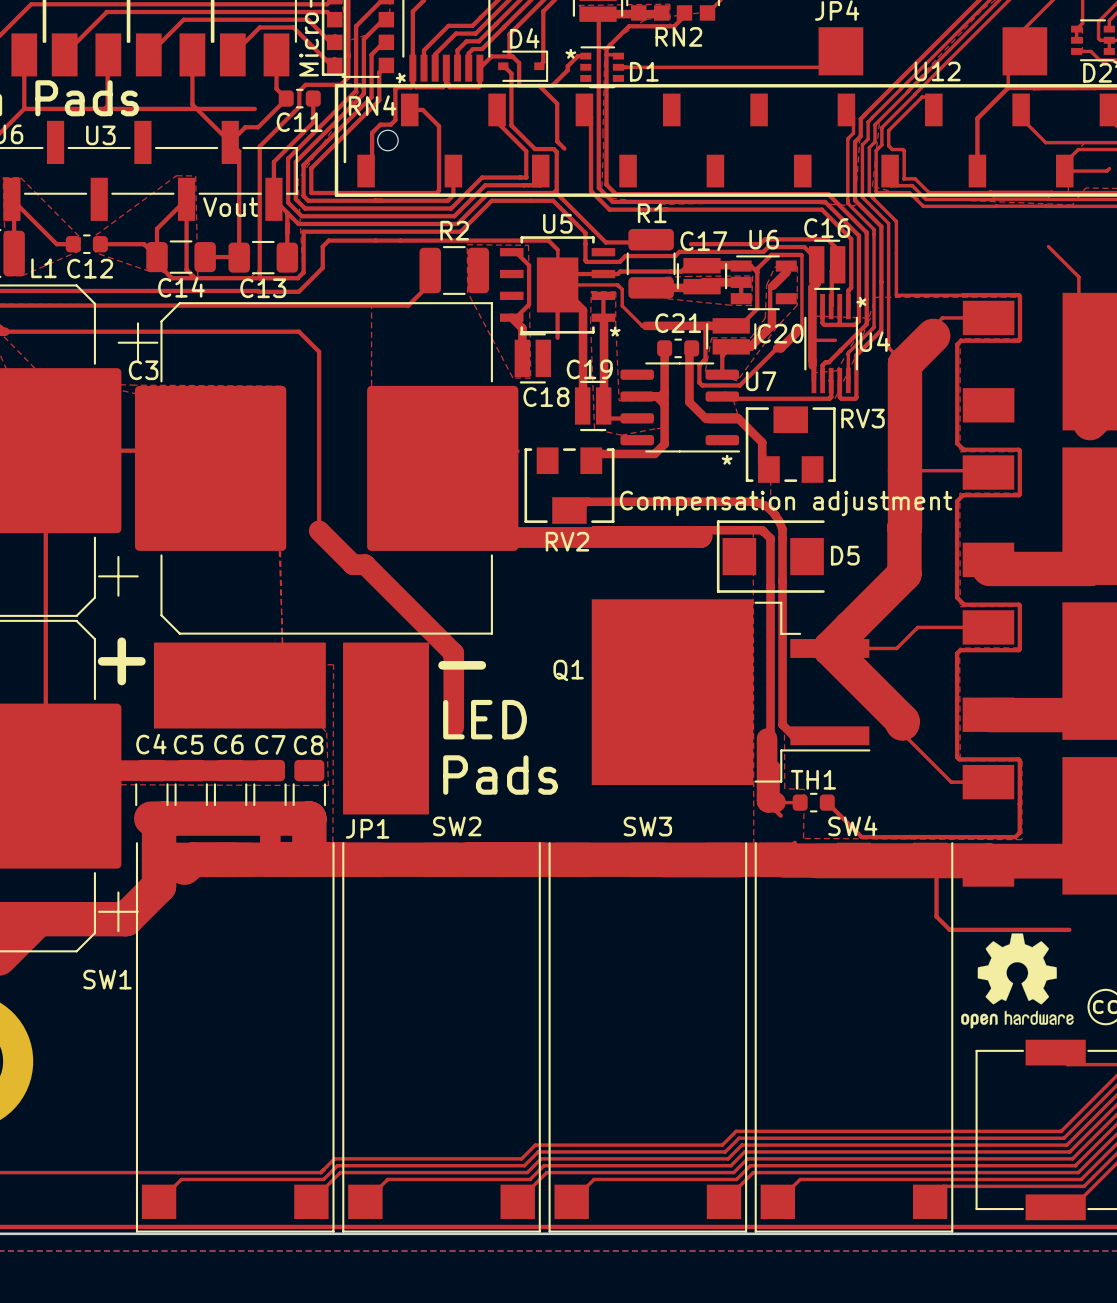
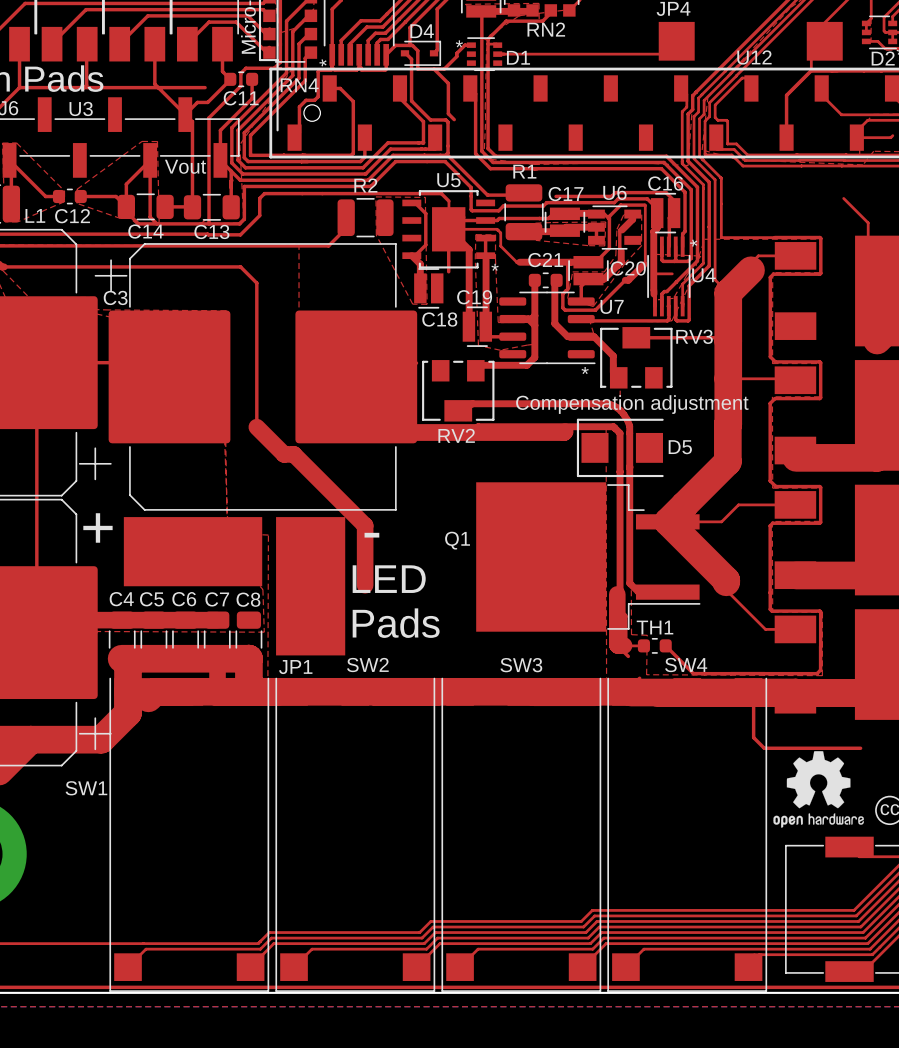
top track: none -> (636, 337) (725, 337) (728, 341)

